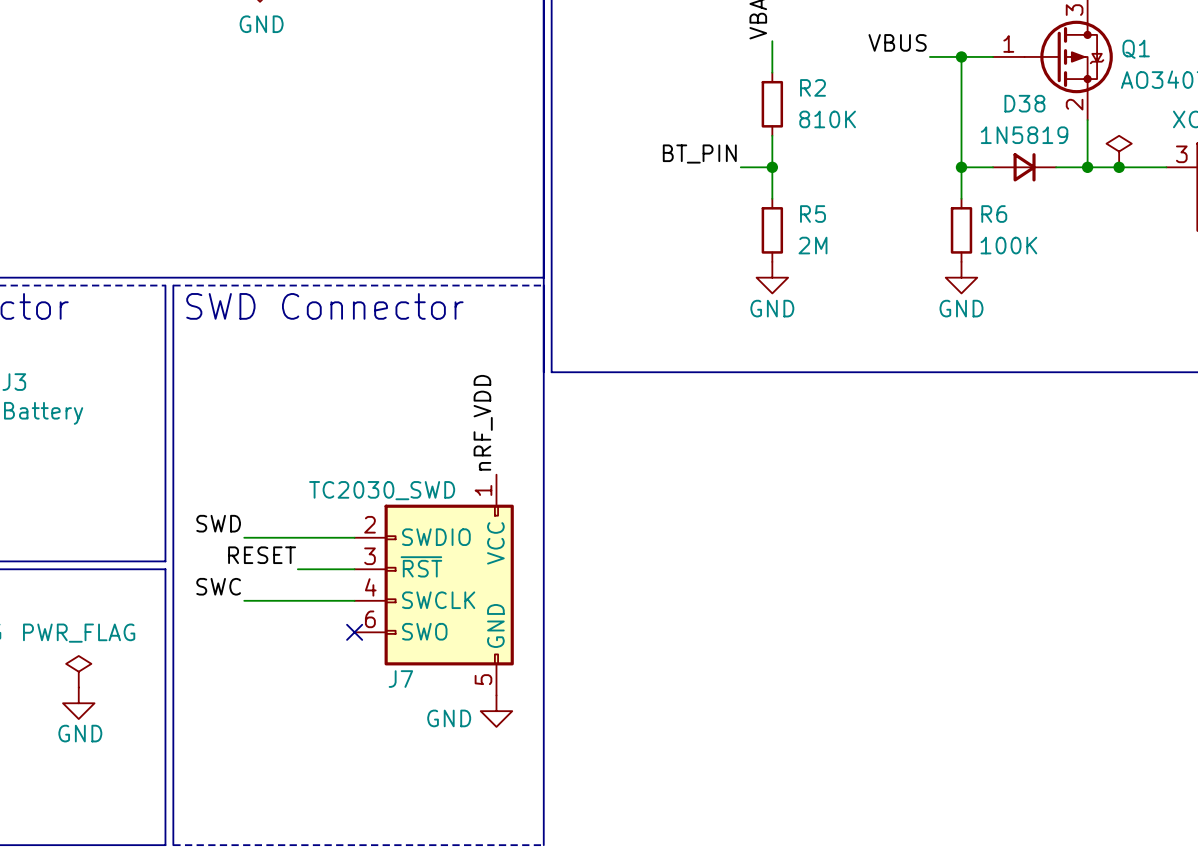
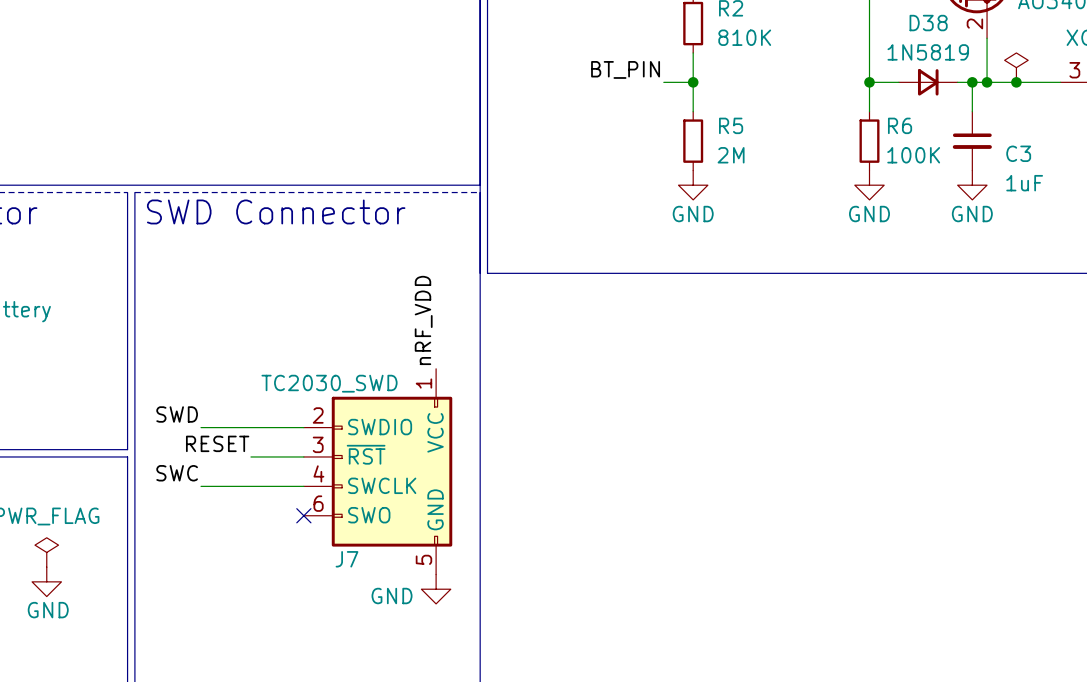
wire: none -> (972, 82) (972, 111)
junction: none -> (972, 82)
C3: none -> 1uF (972, 141)
power symbol: none -> GND (972, 185)

